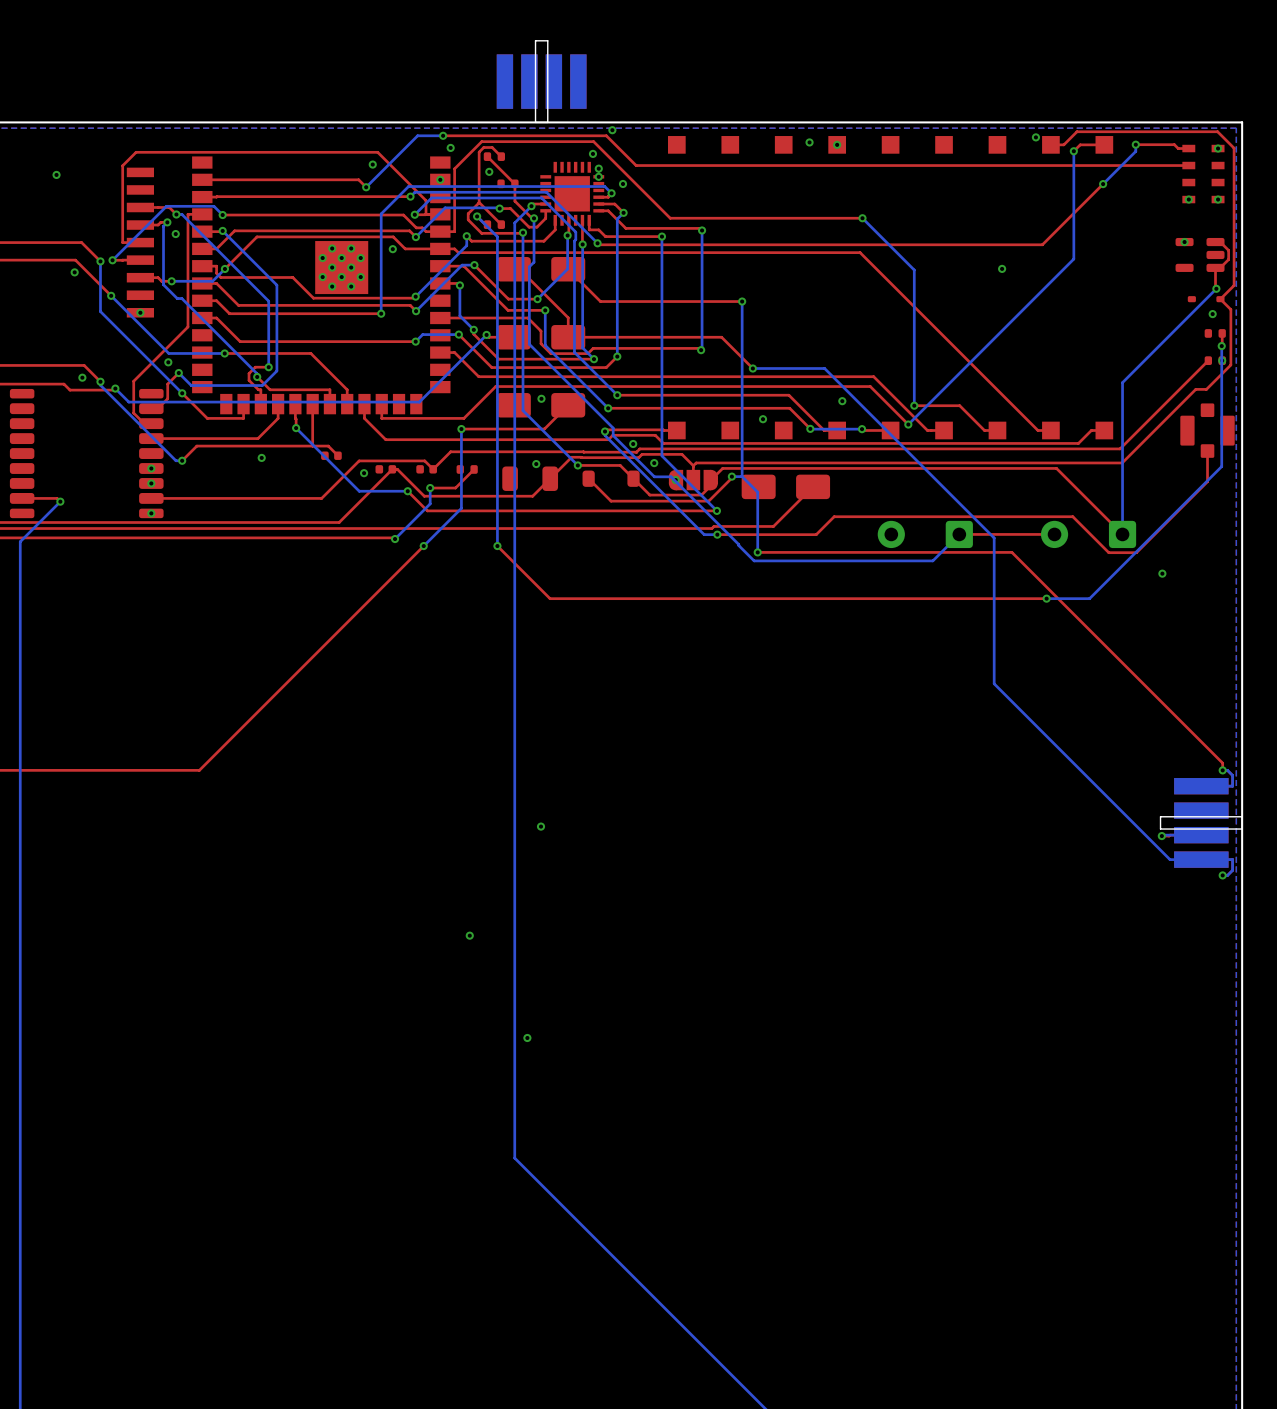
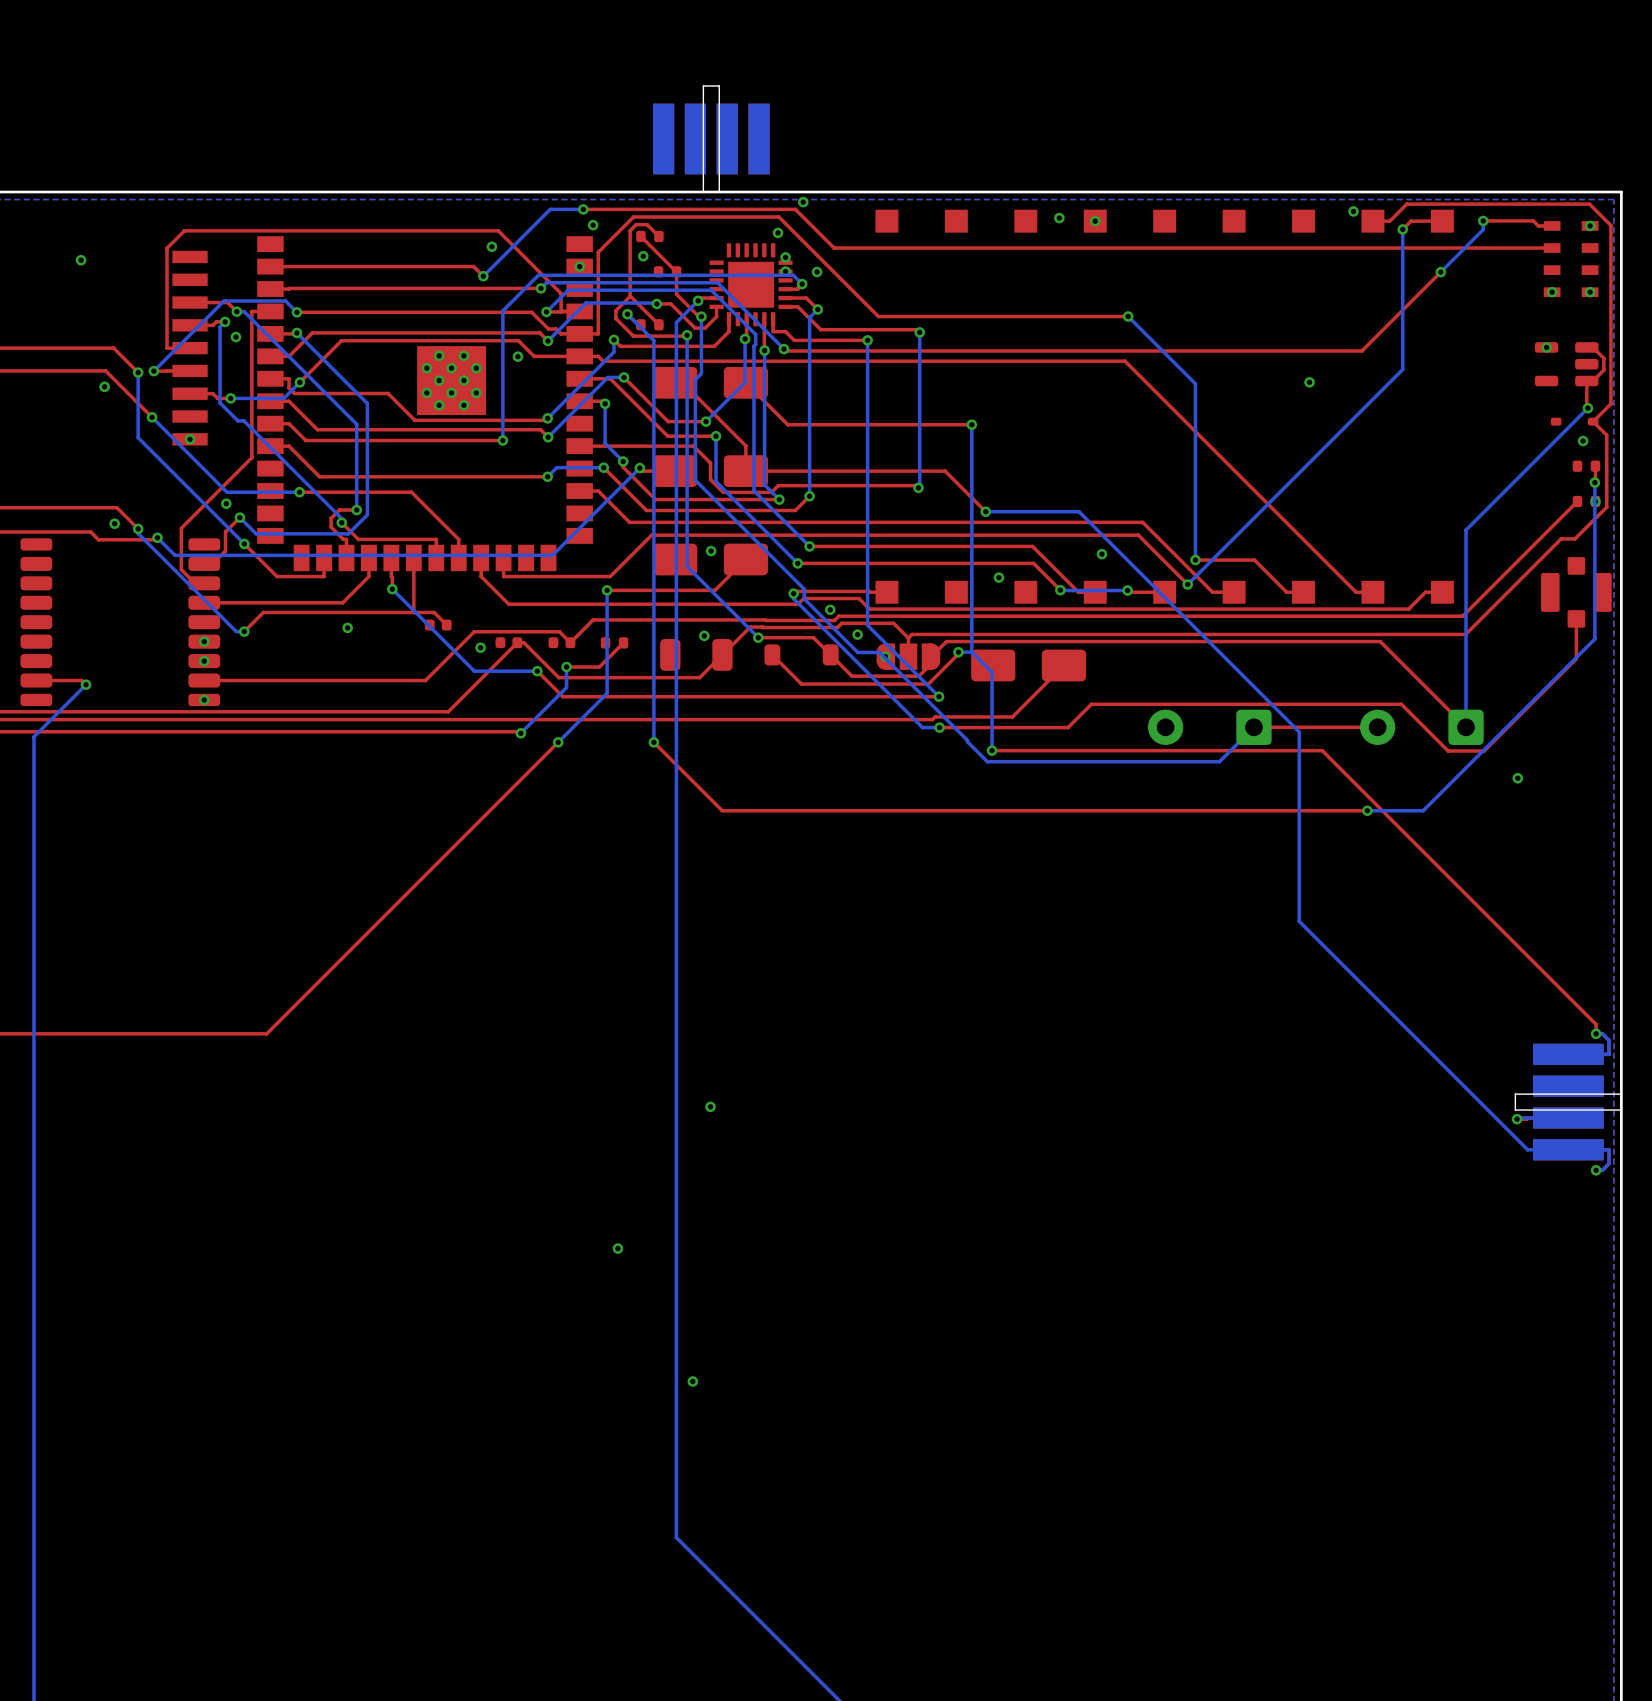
via: (598, 168) -> none
via: none -> (785, 257)
via: (598, 176) -> none
via: none -> (785, 271)

